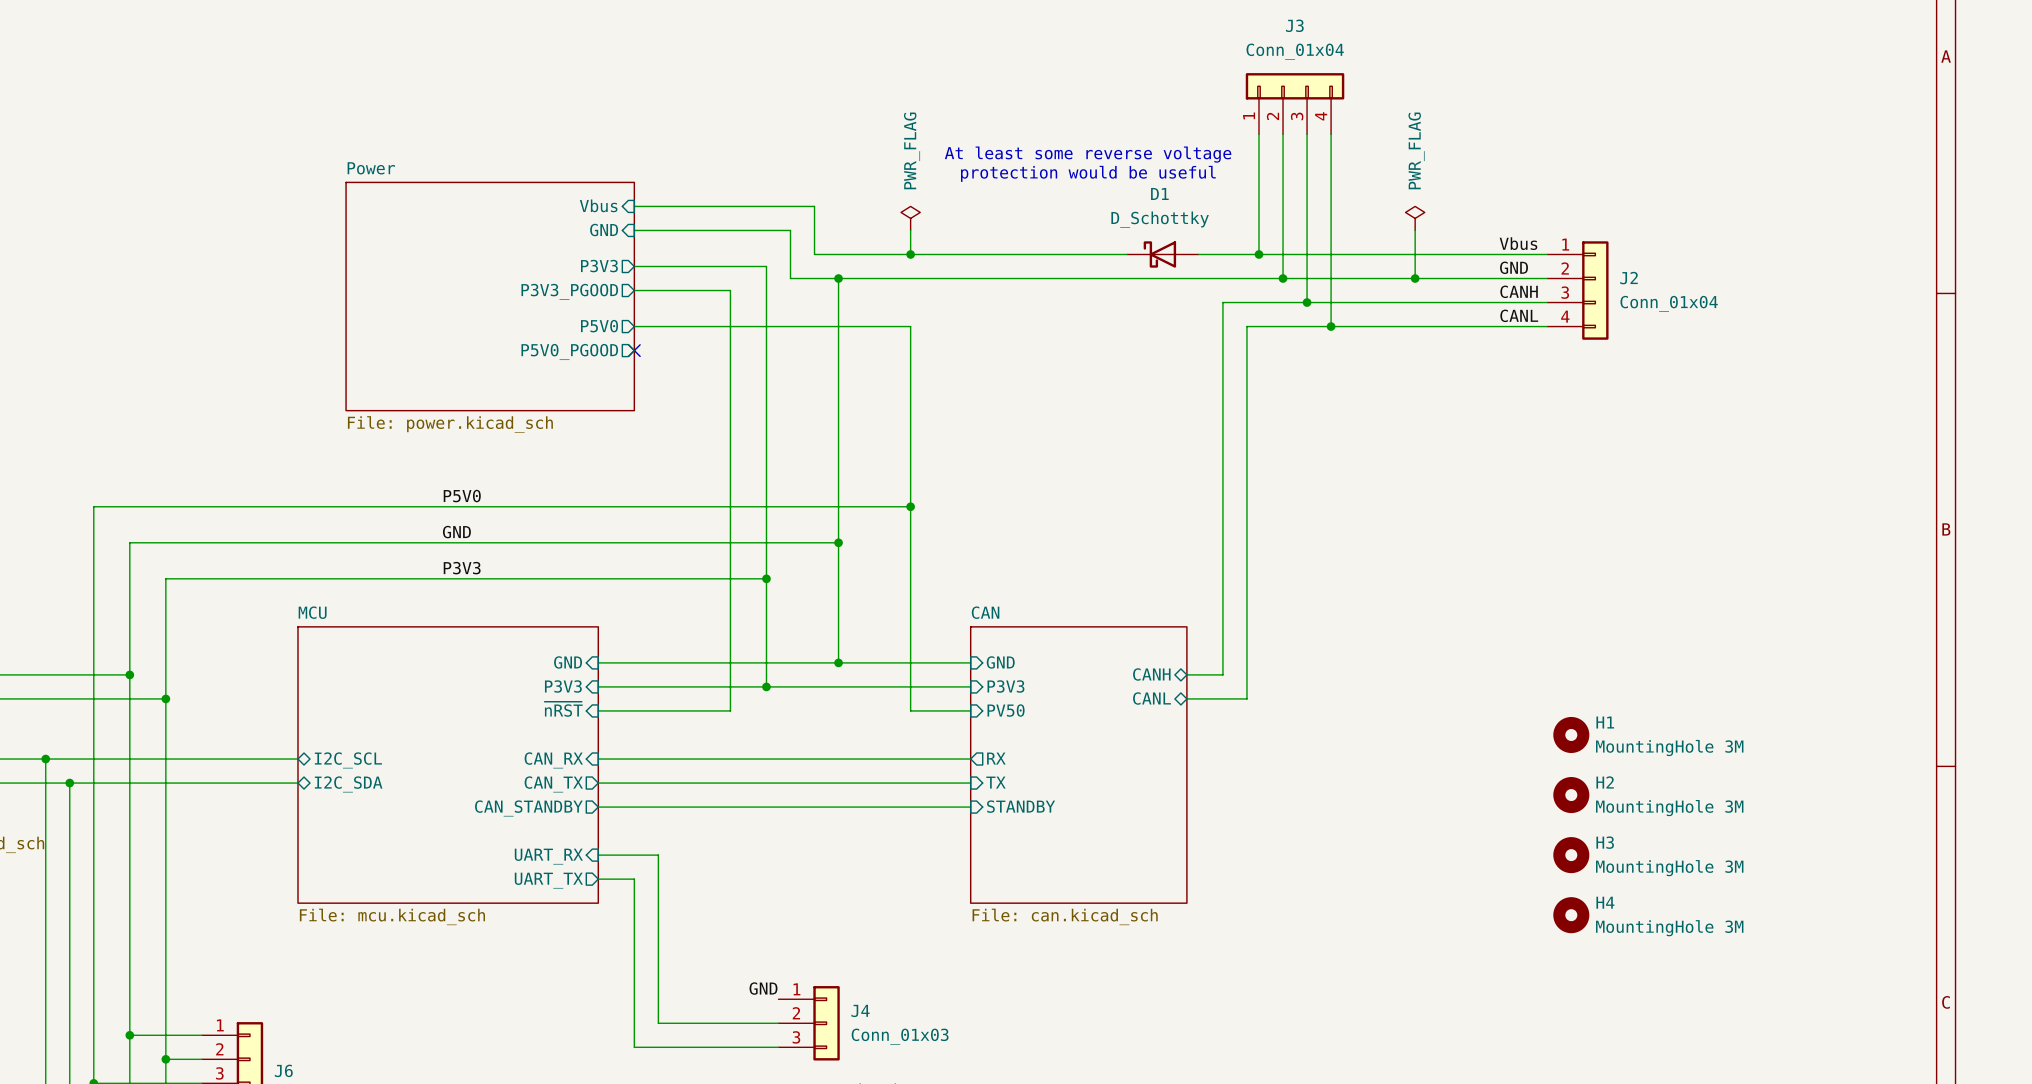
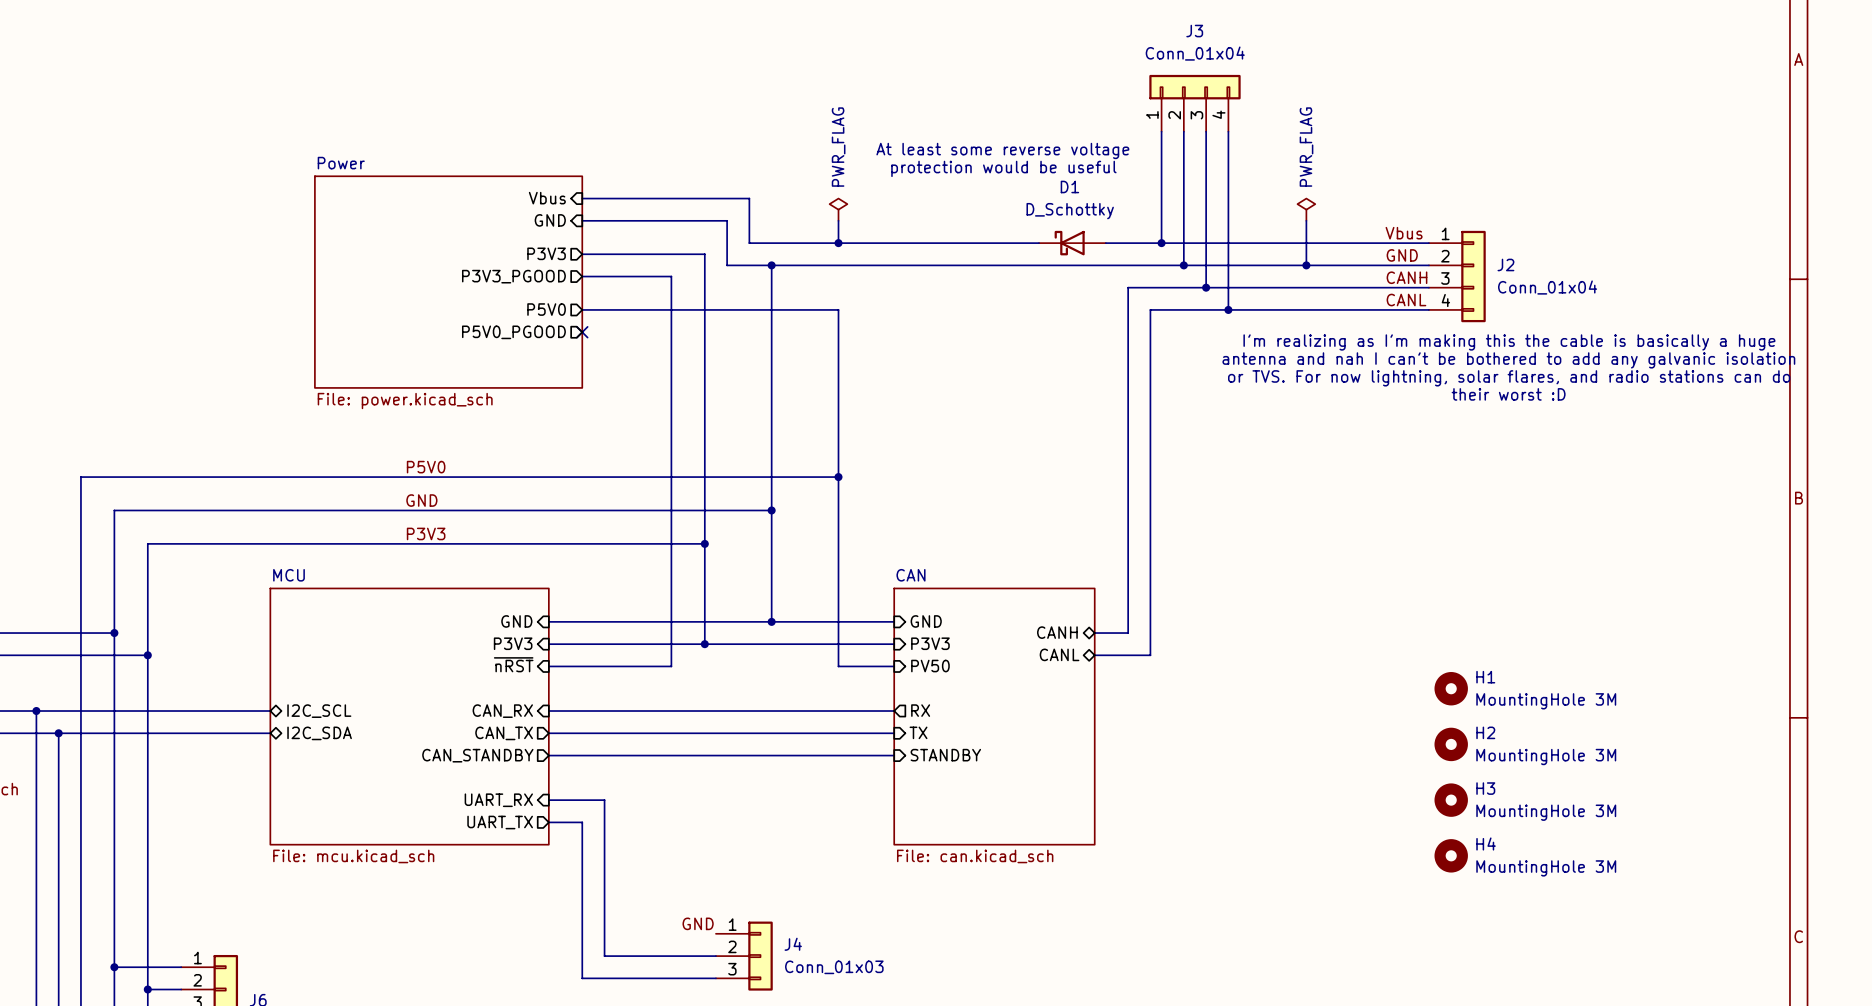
text: none -> I'm realizing as I'm making this the cable is basically a huge (1509, 342)
text: none -> antenna and nah I can't be bothered to add any galvanic isolation (1508, 360)
text: none -> or TVS. For now lightning, solar flares, and radio stations can do (1509, 378)
text: none -> their worst :D (1508, 394)

